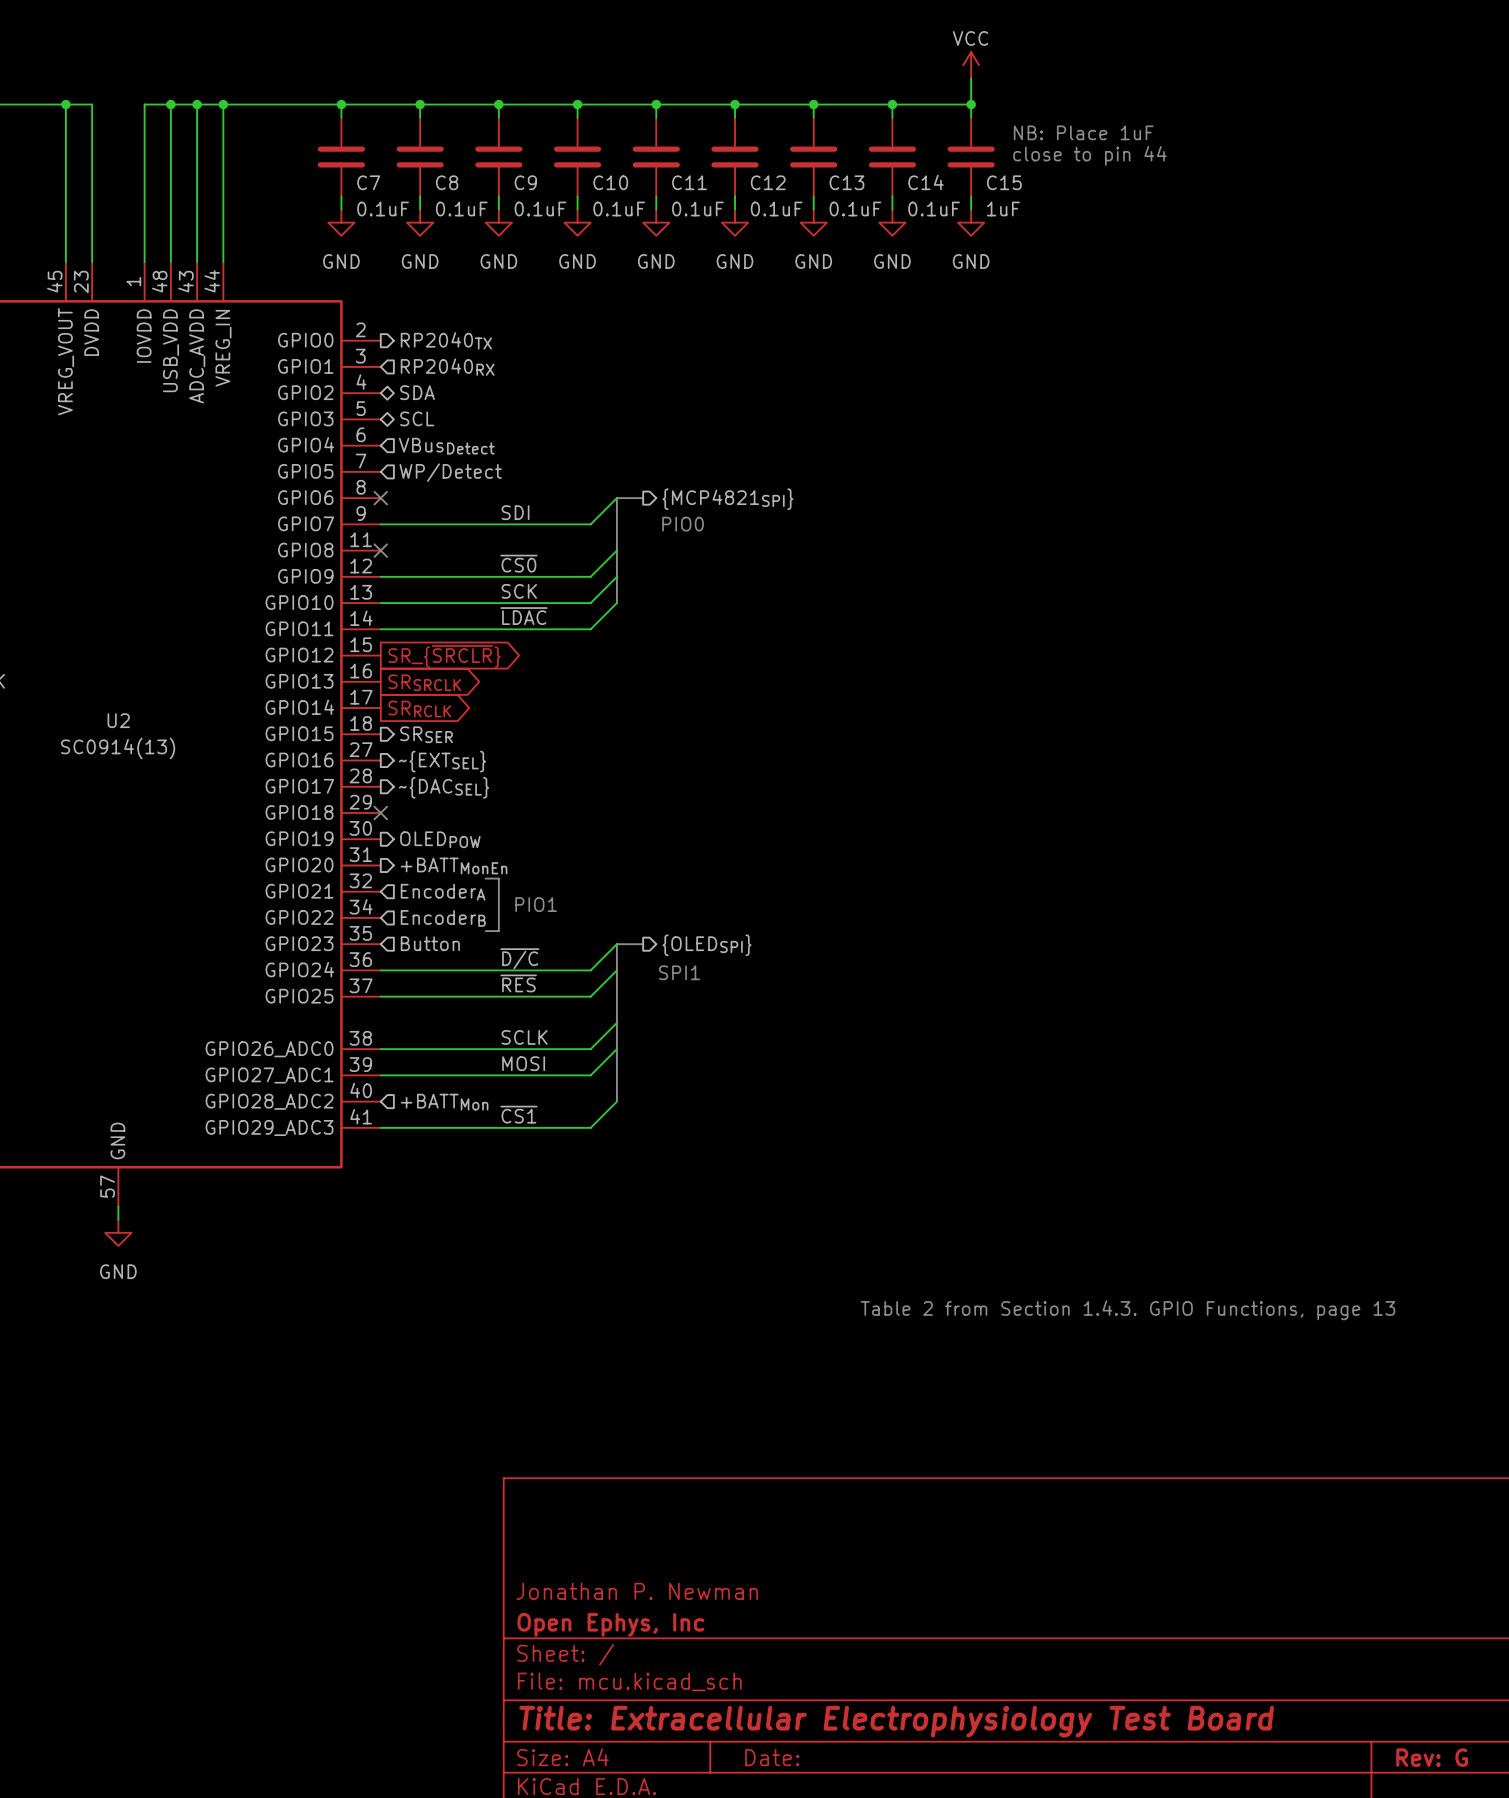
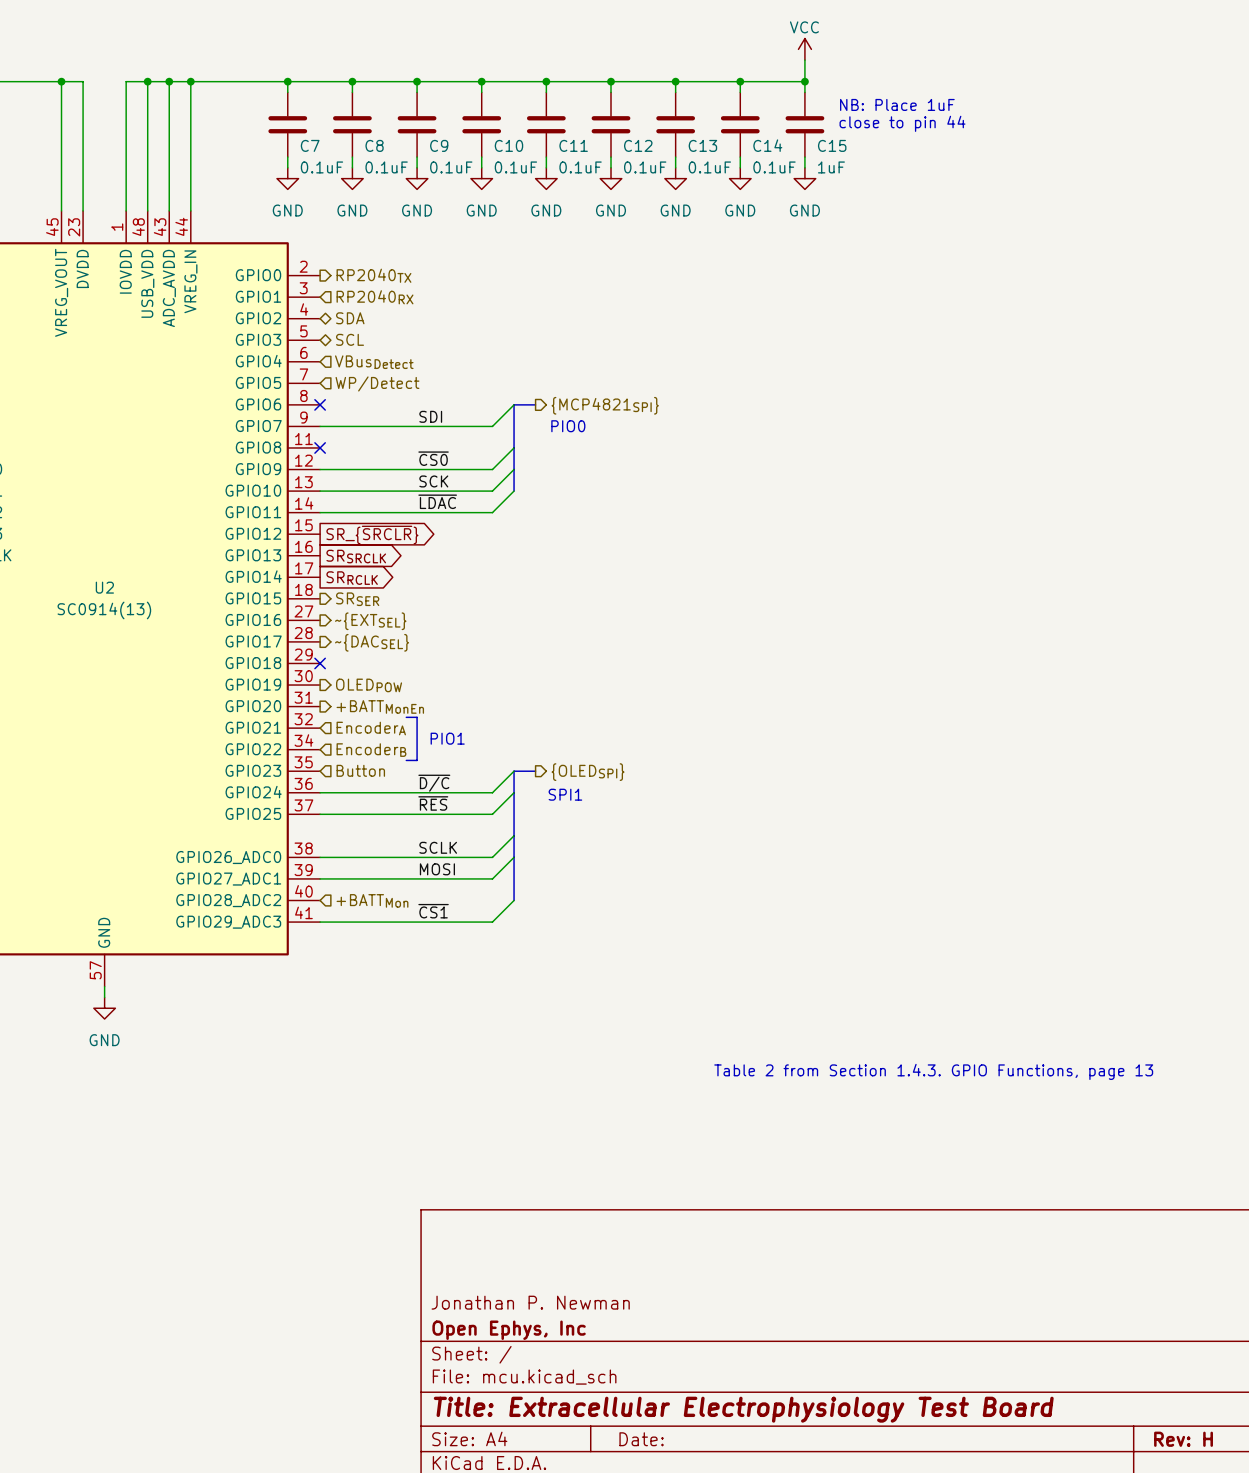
title block: Rev: G (1432, 1757) -> Rev: H (1183, 1439)

